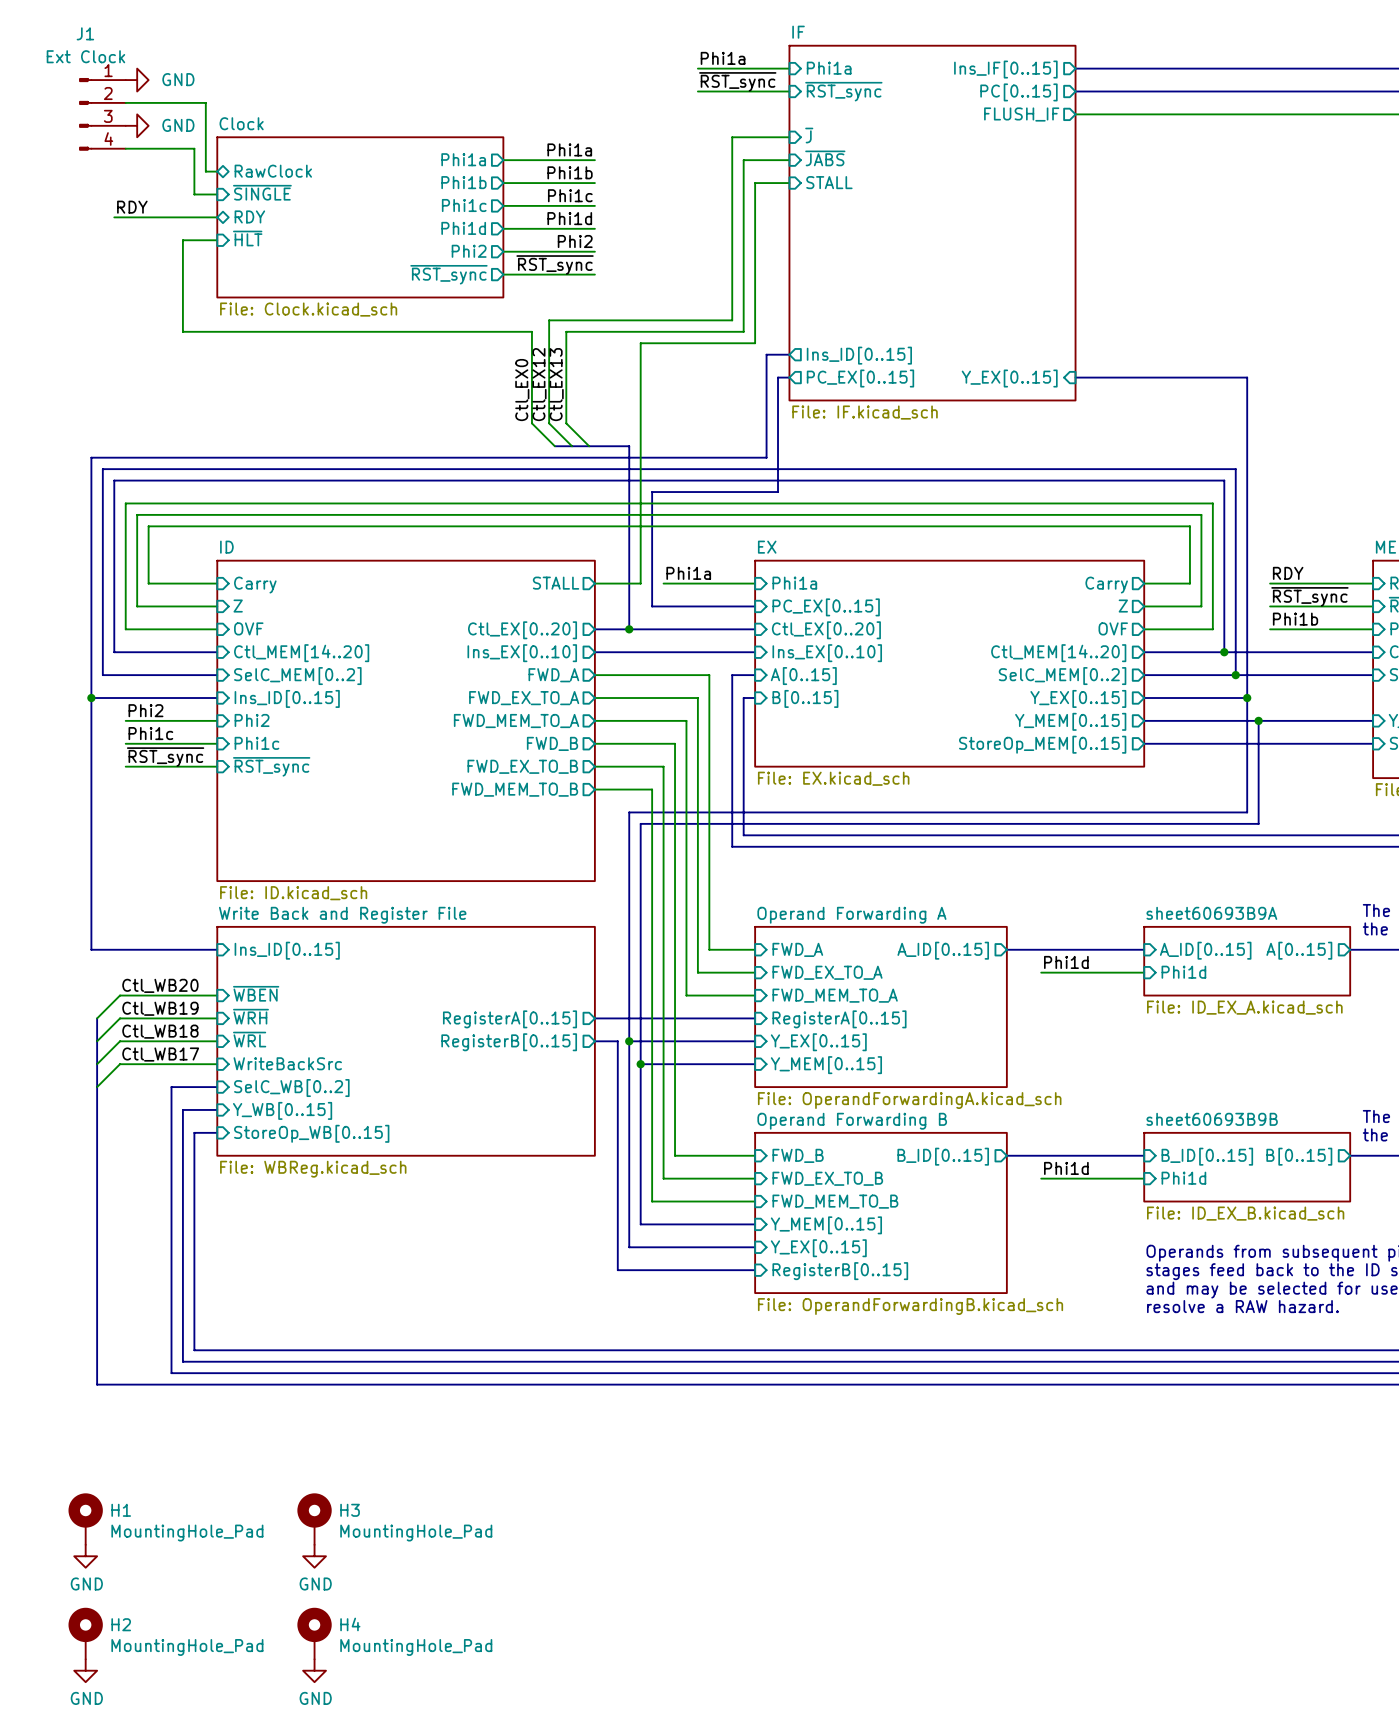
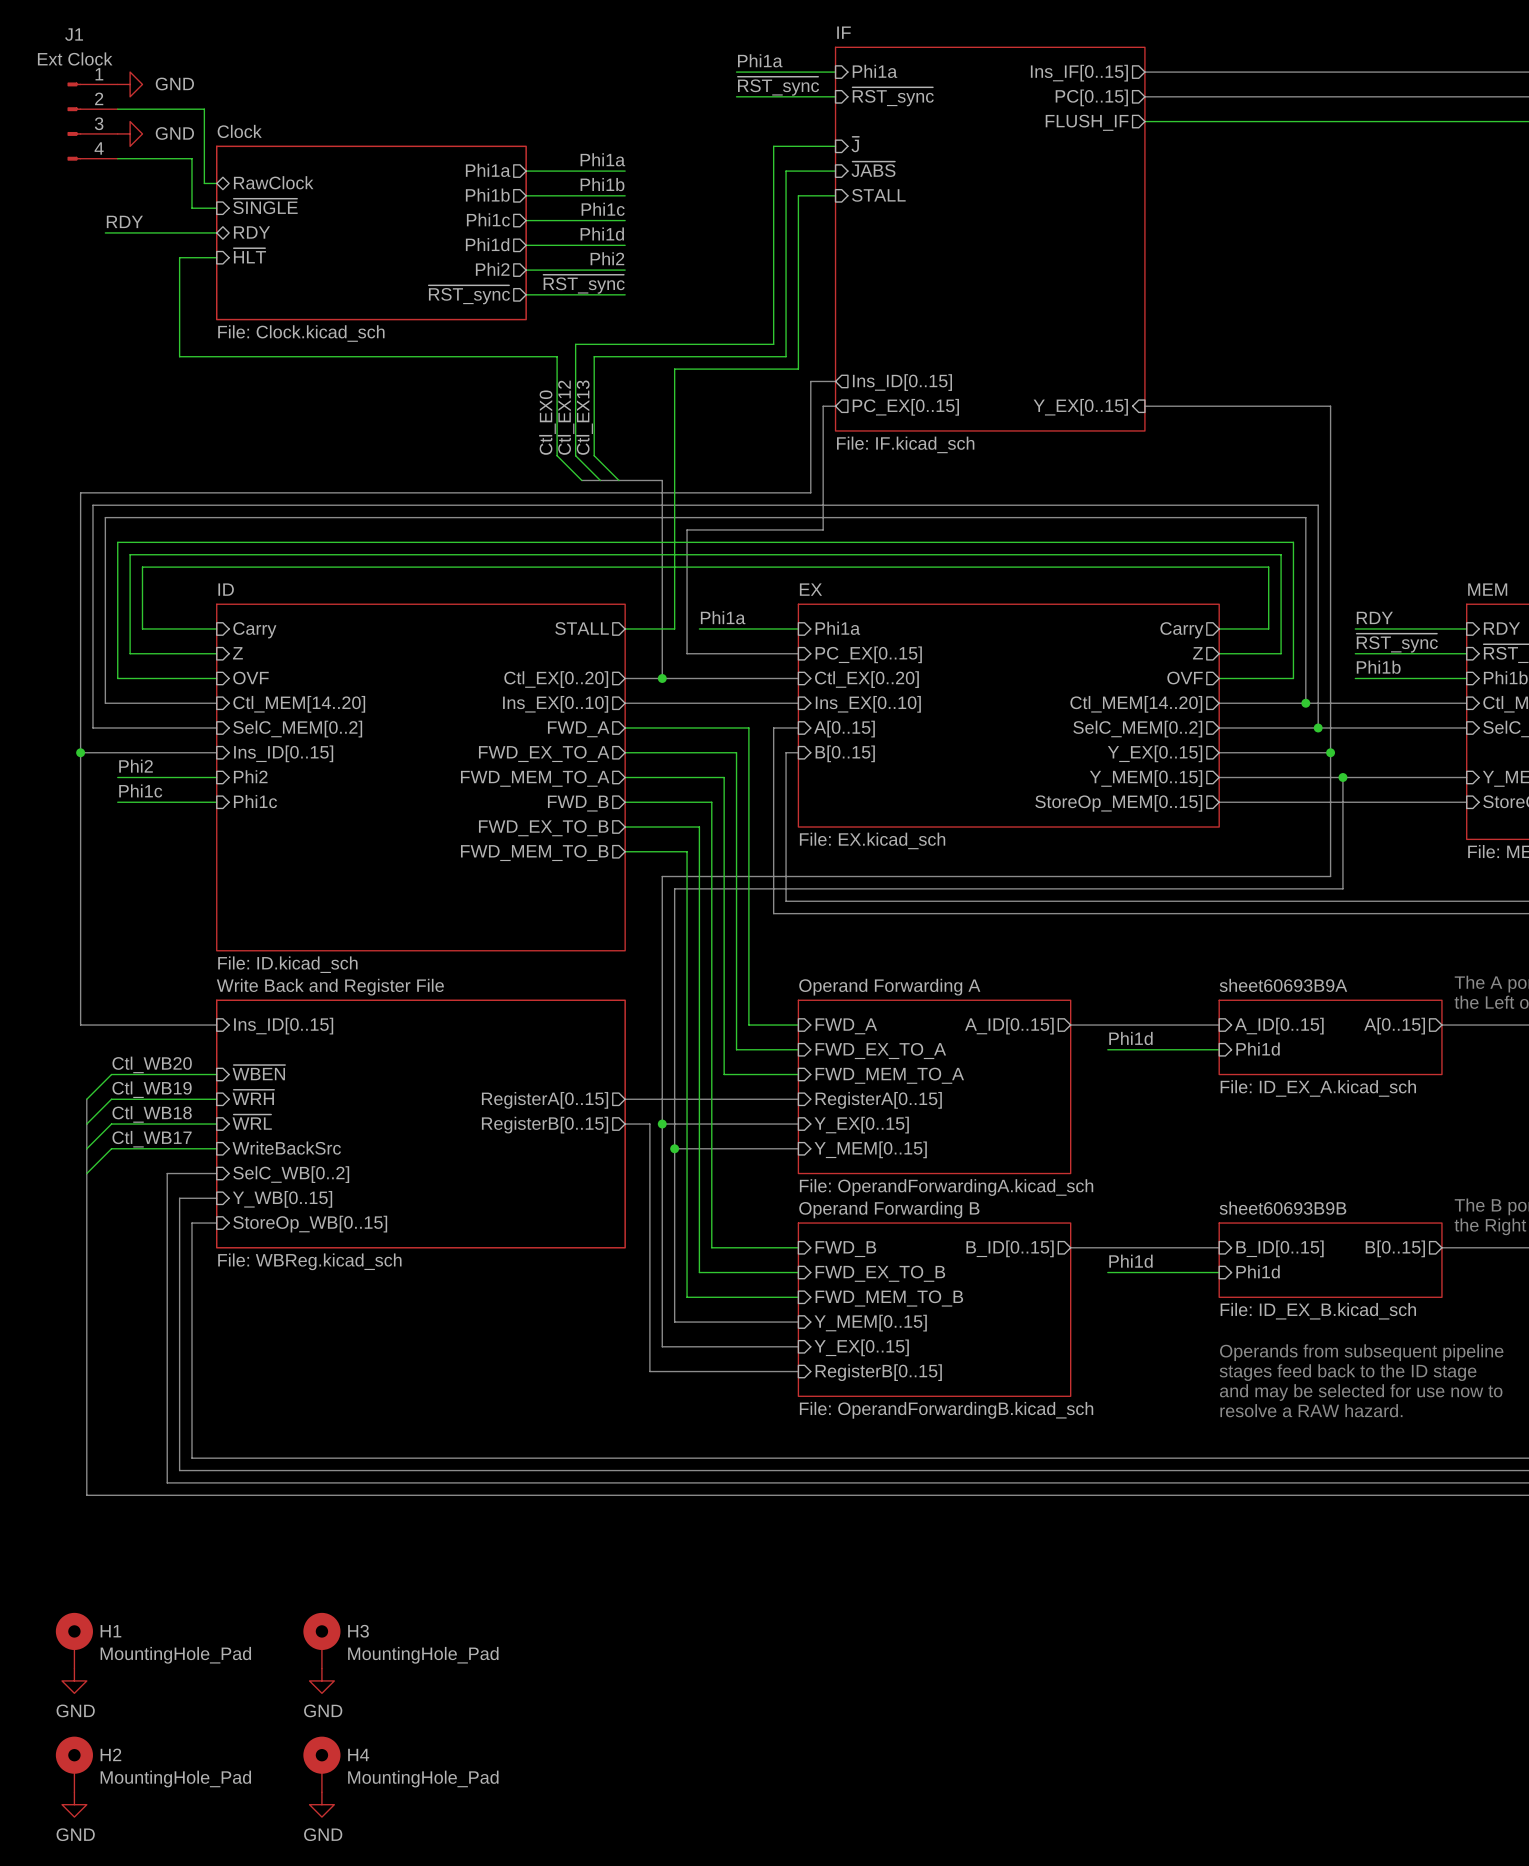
label: ~{RST_sync} (165, 757) -> none
wire: (125, 766) (217, 766) -> none
sheet pin: ~{RST_sync} (271, 766) -> none

